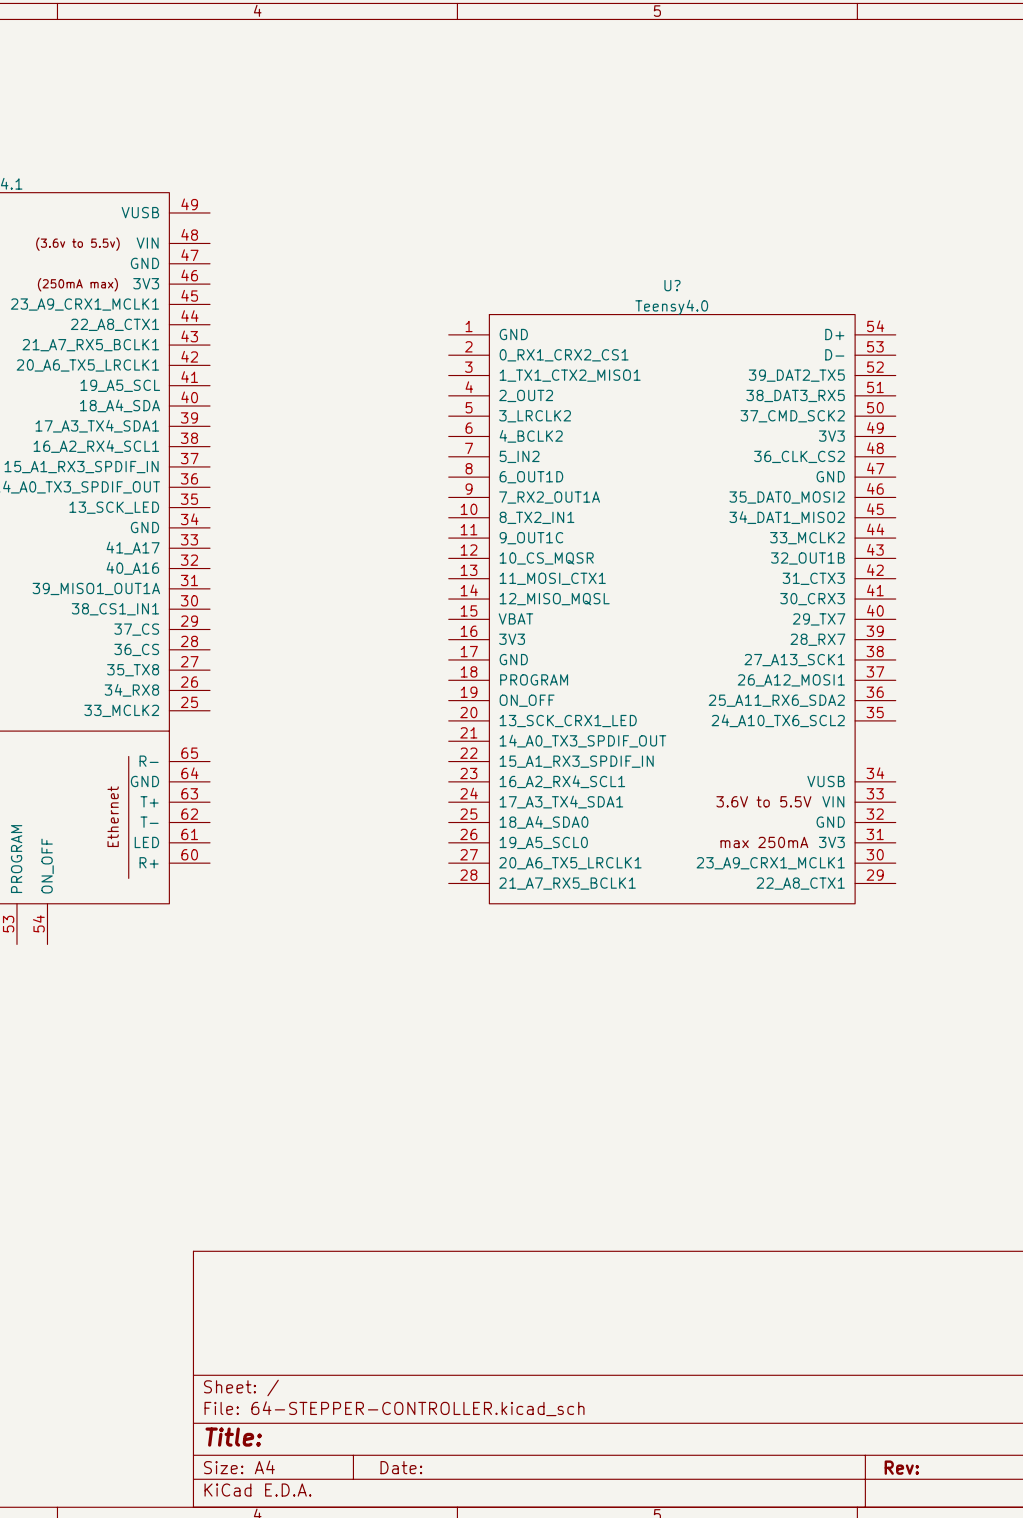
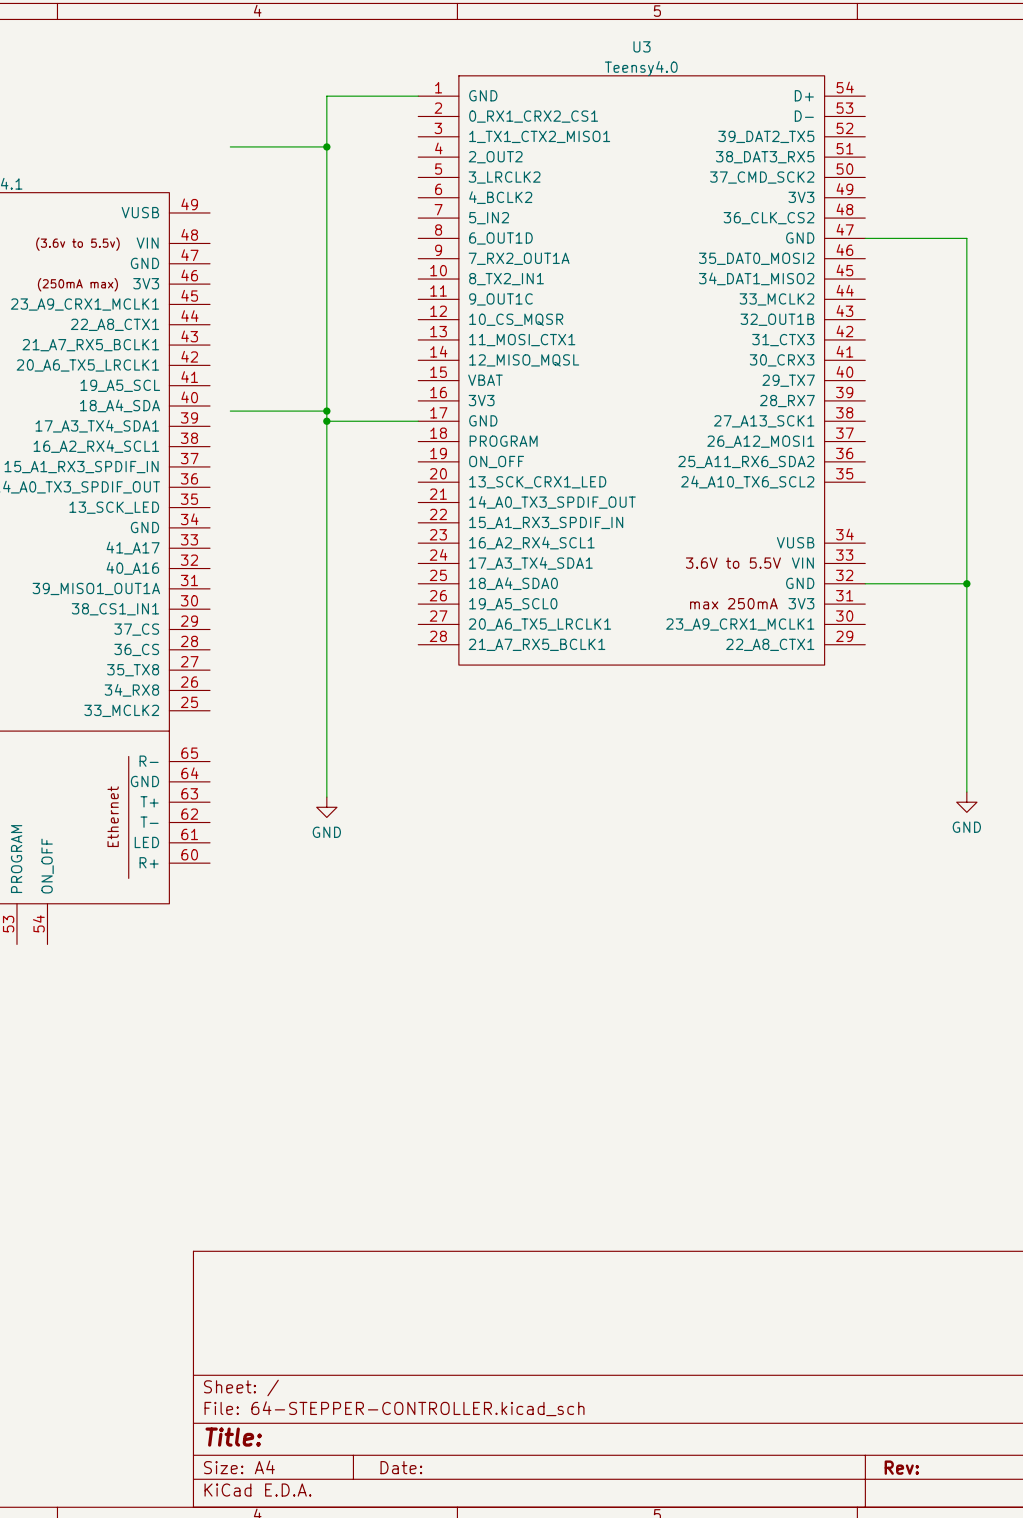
wire: none -> (418, 96) (326, 96) (326, 797)
wire: none -> (230, 146) (326, 146)
junction: none -> (326, 146)
wire: none -> (865, 238) (966, 238) (966, 792)
U3: none -> Teensy4.0 (641, 370)
wire: none -> (230, 411) (326, 411)
junction: none -> (326, 411)
wire: none -> (326, 421) (418, 421)
junction: none -> (326, 421)
wire: none -> (865, 583) (966, 583)
junction: none -> (966, 583)
U?: Teensy4.0 (672, 609) -> none
power symbol: none -> GND (966, 802)
power symbol: none -> GND (326, 807)

